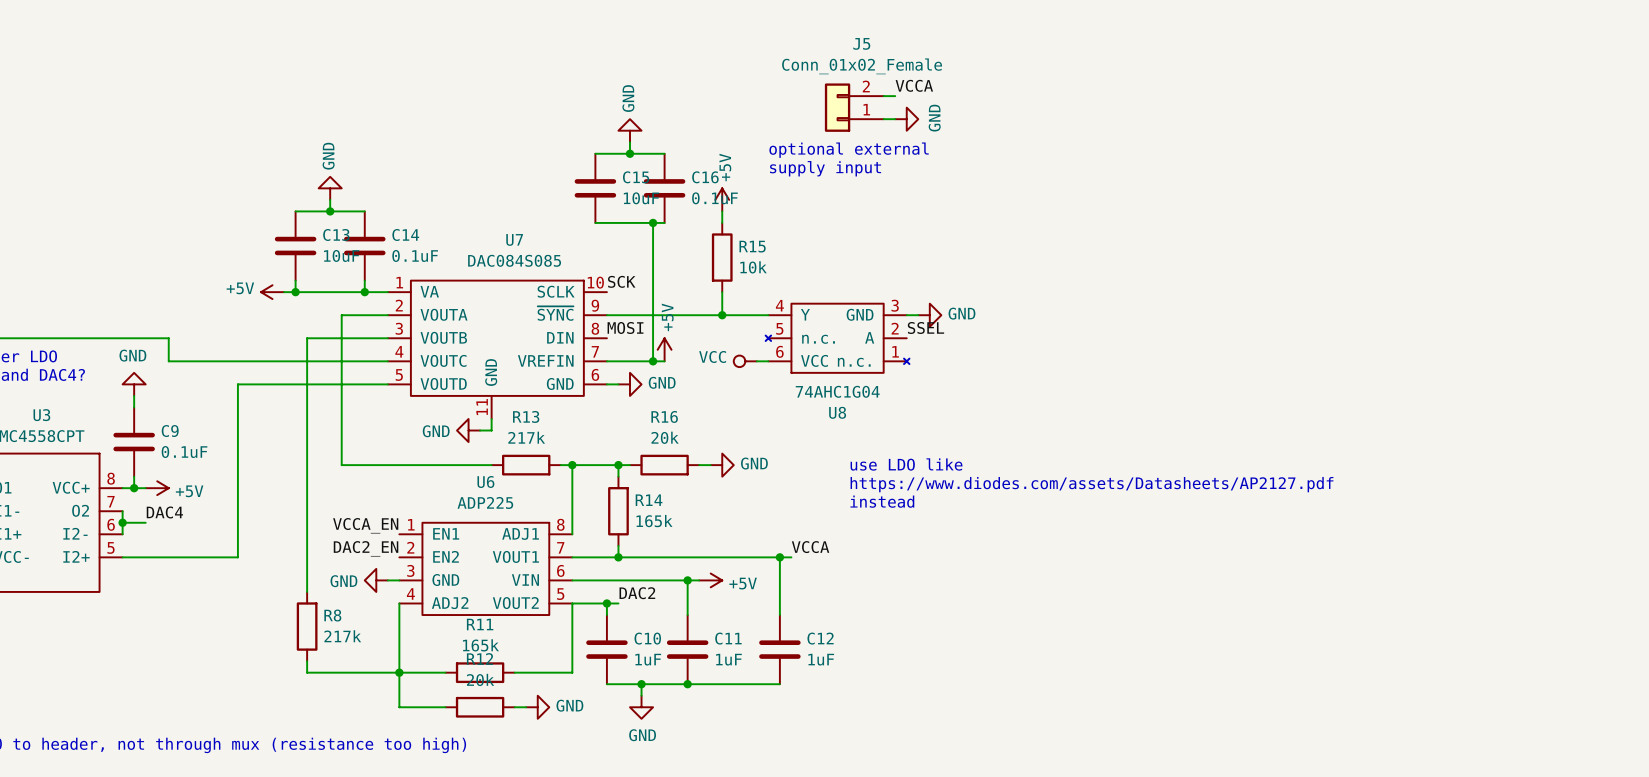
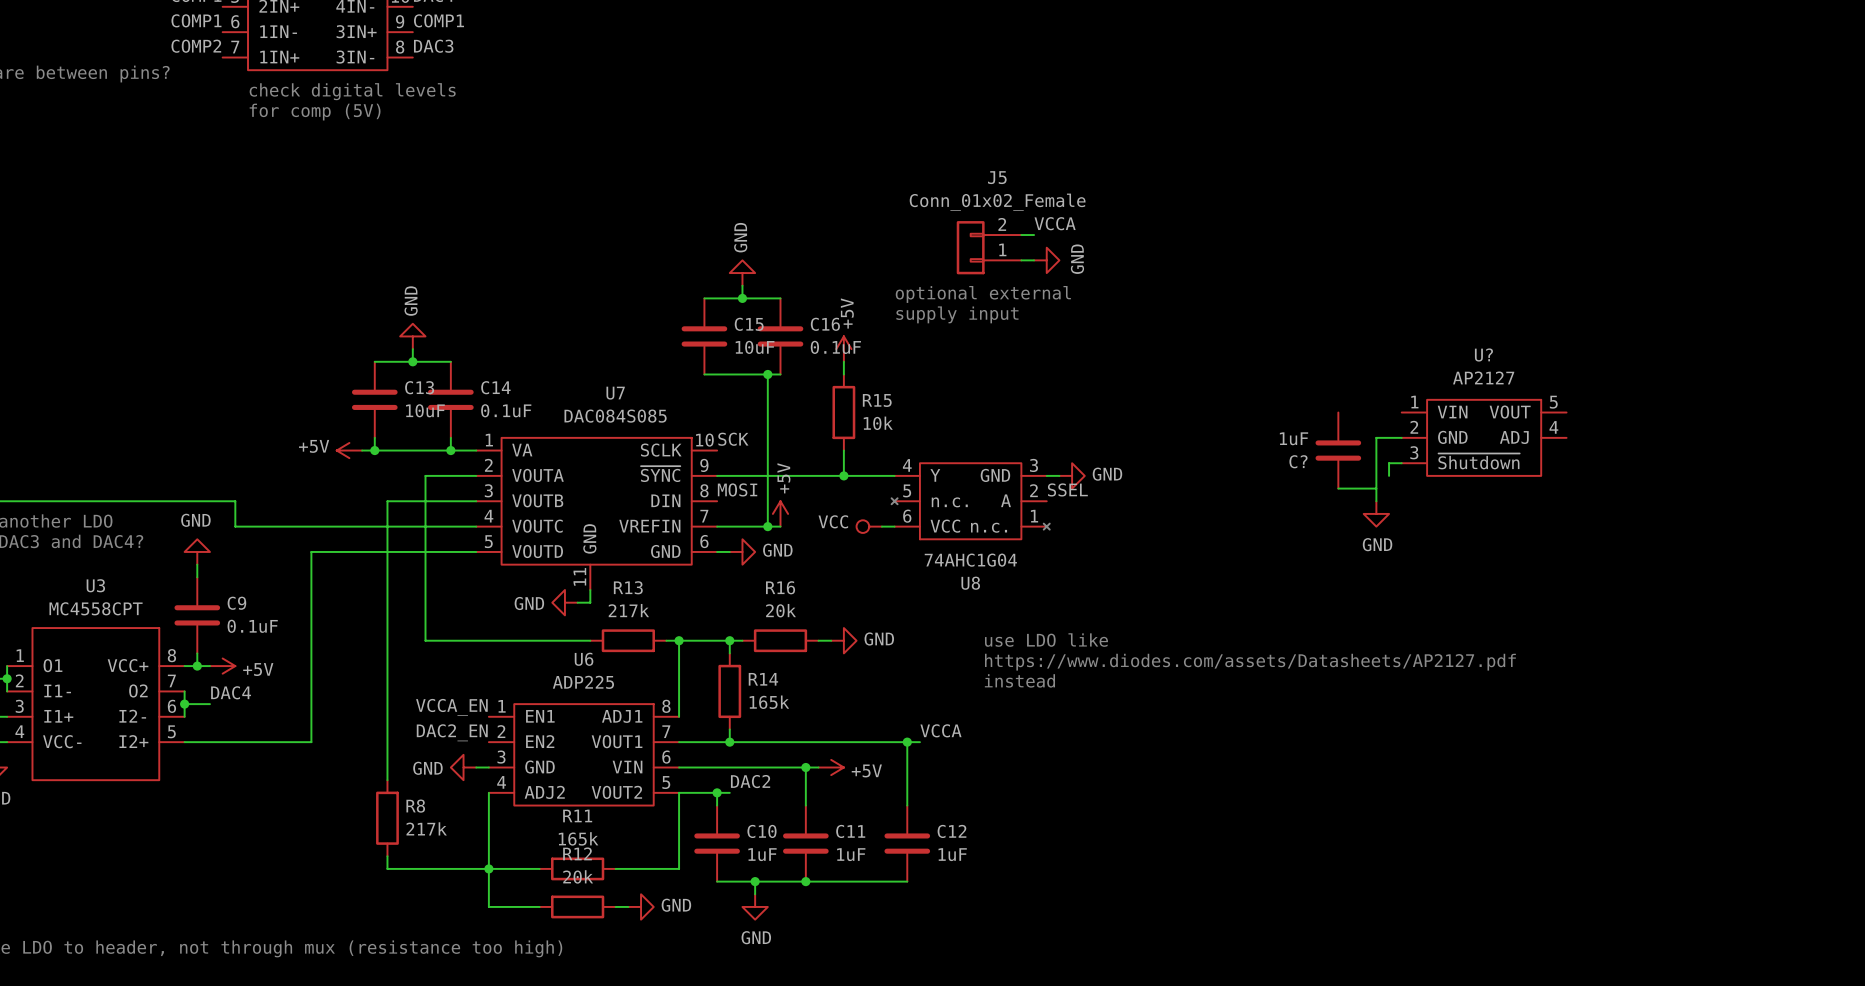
wire: none -> (1401, 437) (1376, 437) (1376, 501)
U?: none -> AP2127 (1484, 437)
C?: none -> 1uF (1338, 450)
wire: none -> (1401, 463) (1389, 463) (1389, 475)
wire: none -> (1338, 488) (1376, 488)
power symbol: none -> GND (1376, 513)

